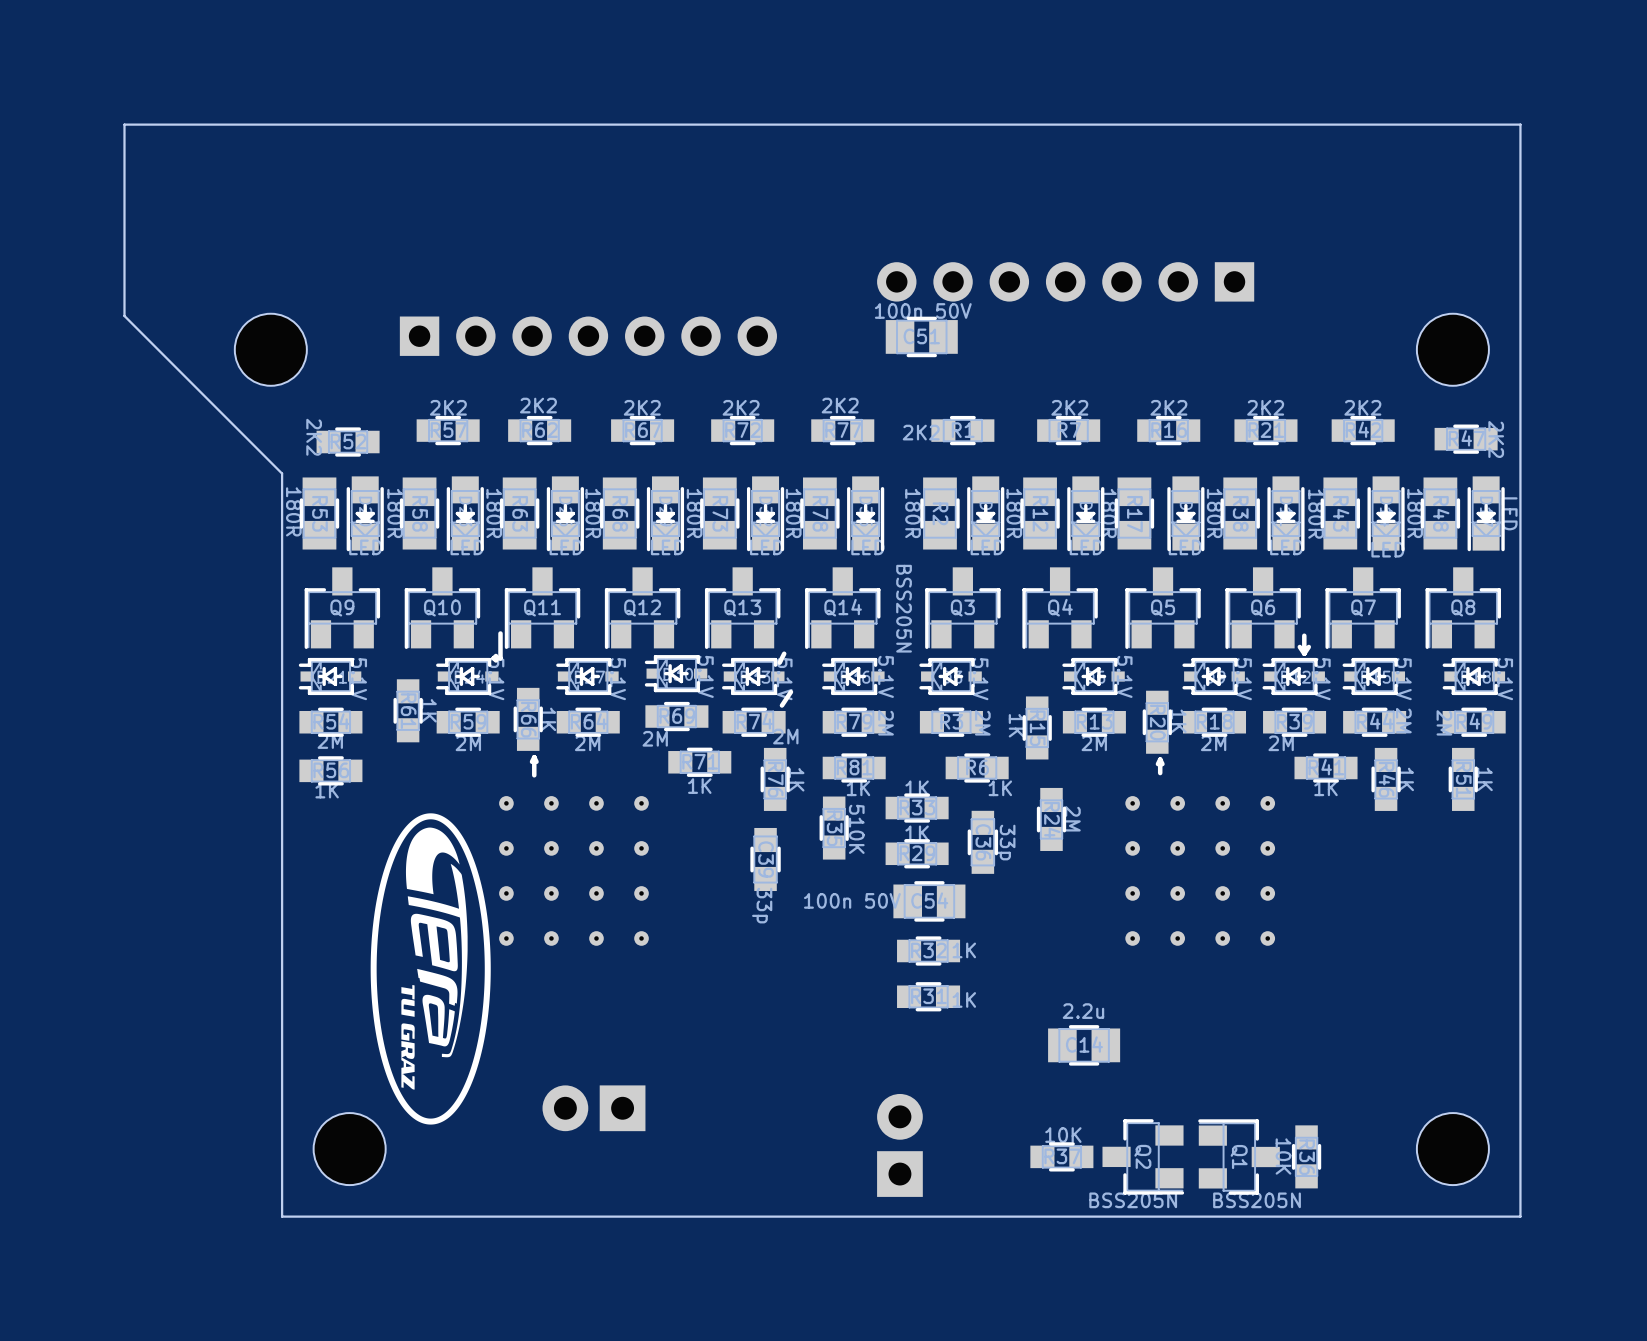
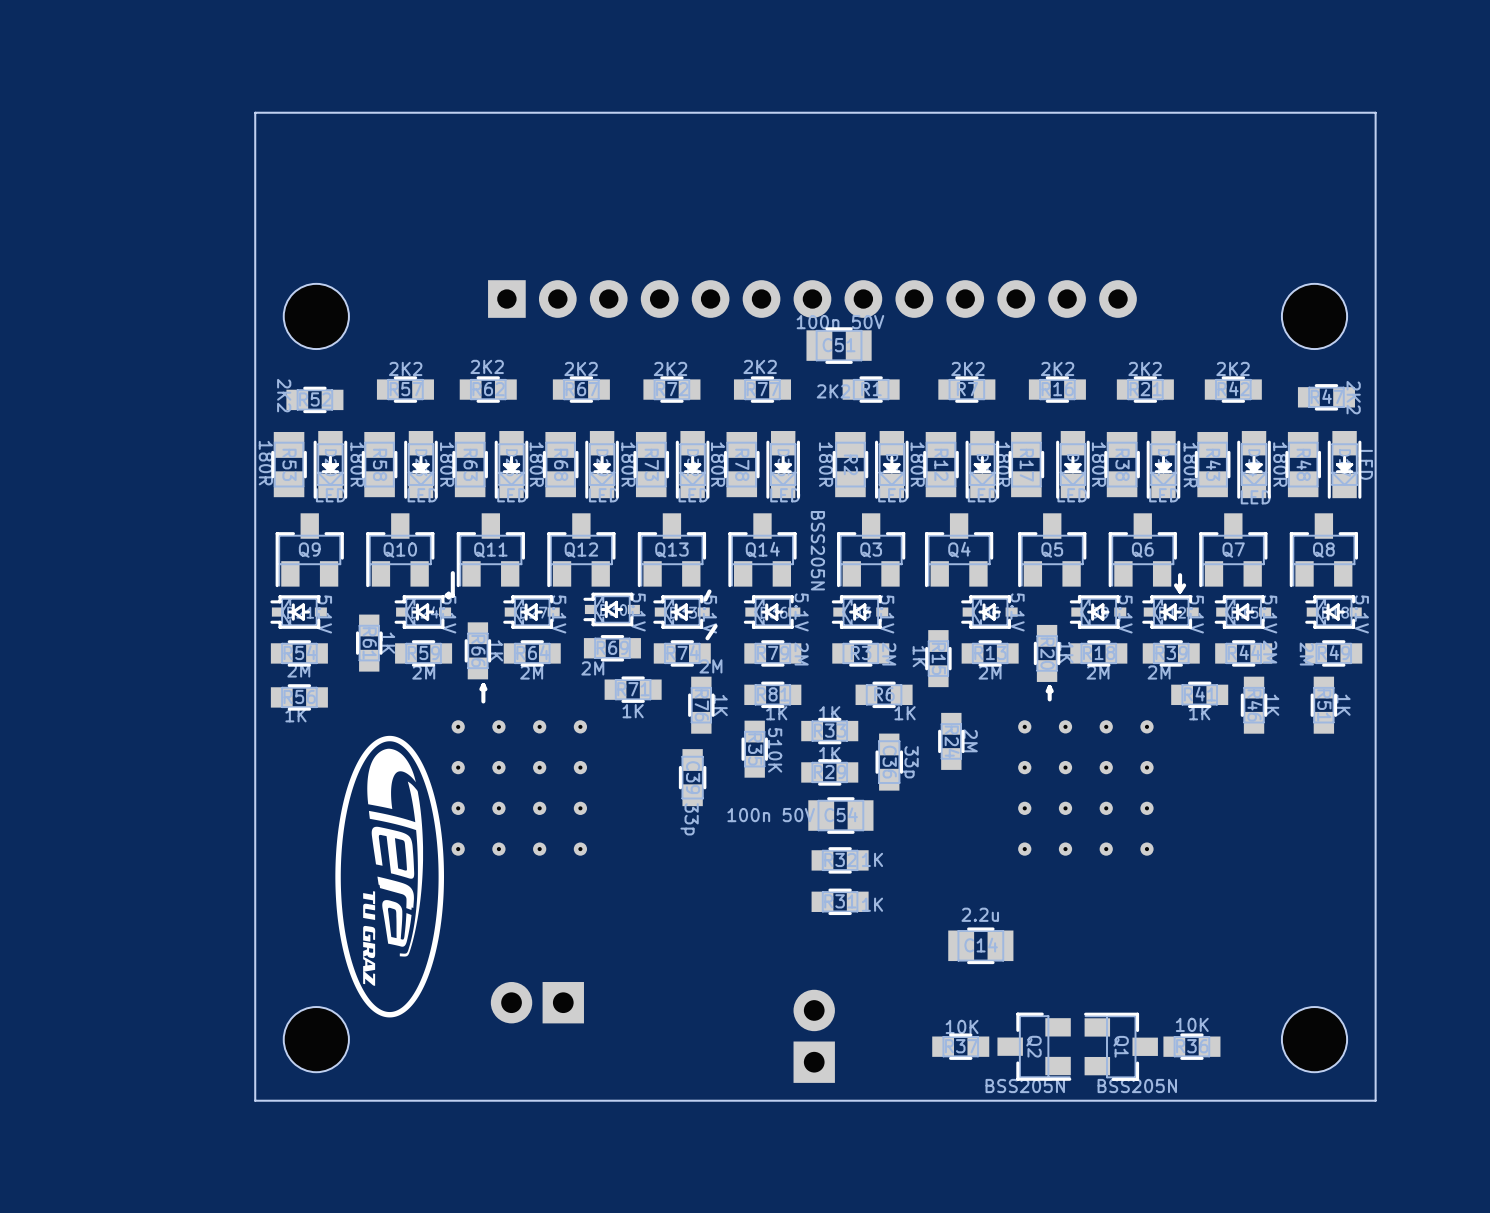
board edge: (282, 124) (124, 124) (124, 315) (282, 473) -> (255, 112) (255, 428)
part: (1065, 281) -> none
part: none -> (812, 299)
part: (588, 336) -> none
part position: (921, 336) -> (839, 345)
part position: (270, 349) -> (316, 316)
part rotation: 0° (1306, 1156) -> 90° clockwise (1191, 1046)

